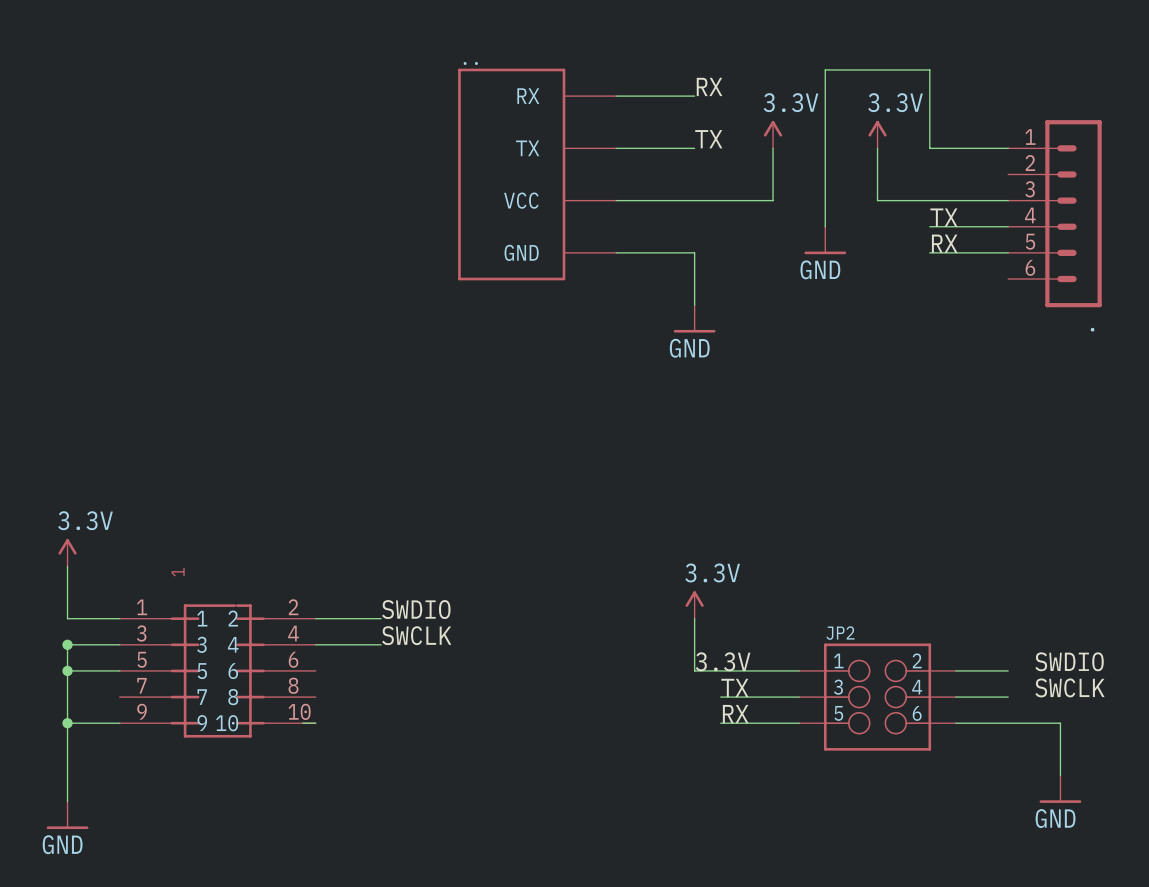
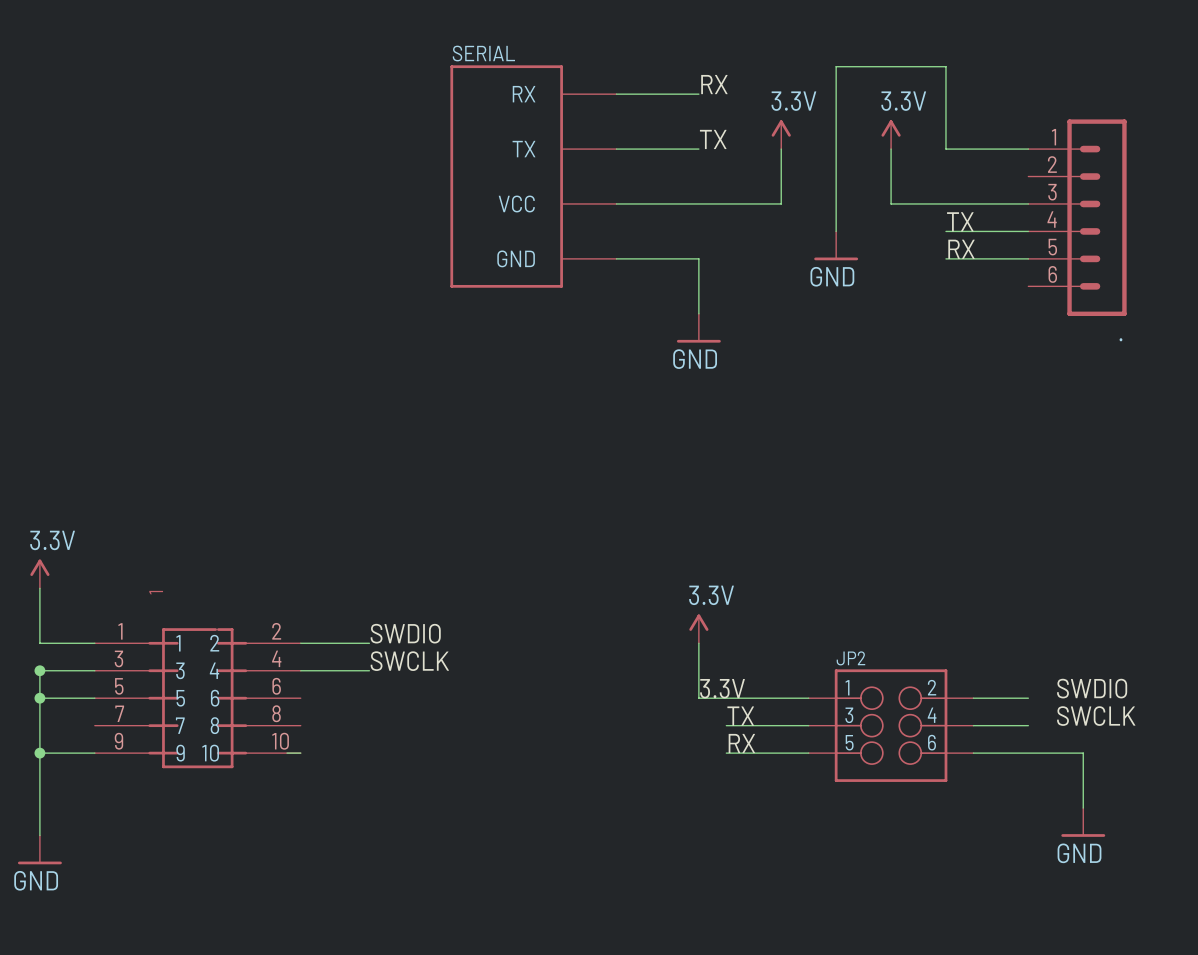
SERIAL name: .. (470, 63) -> SERIAL (483, 53)

